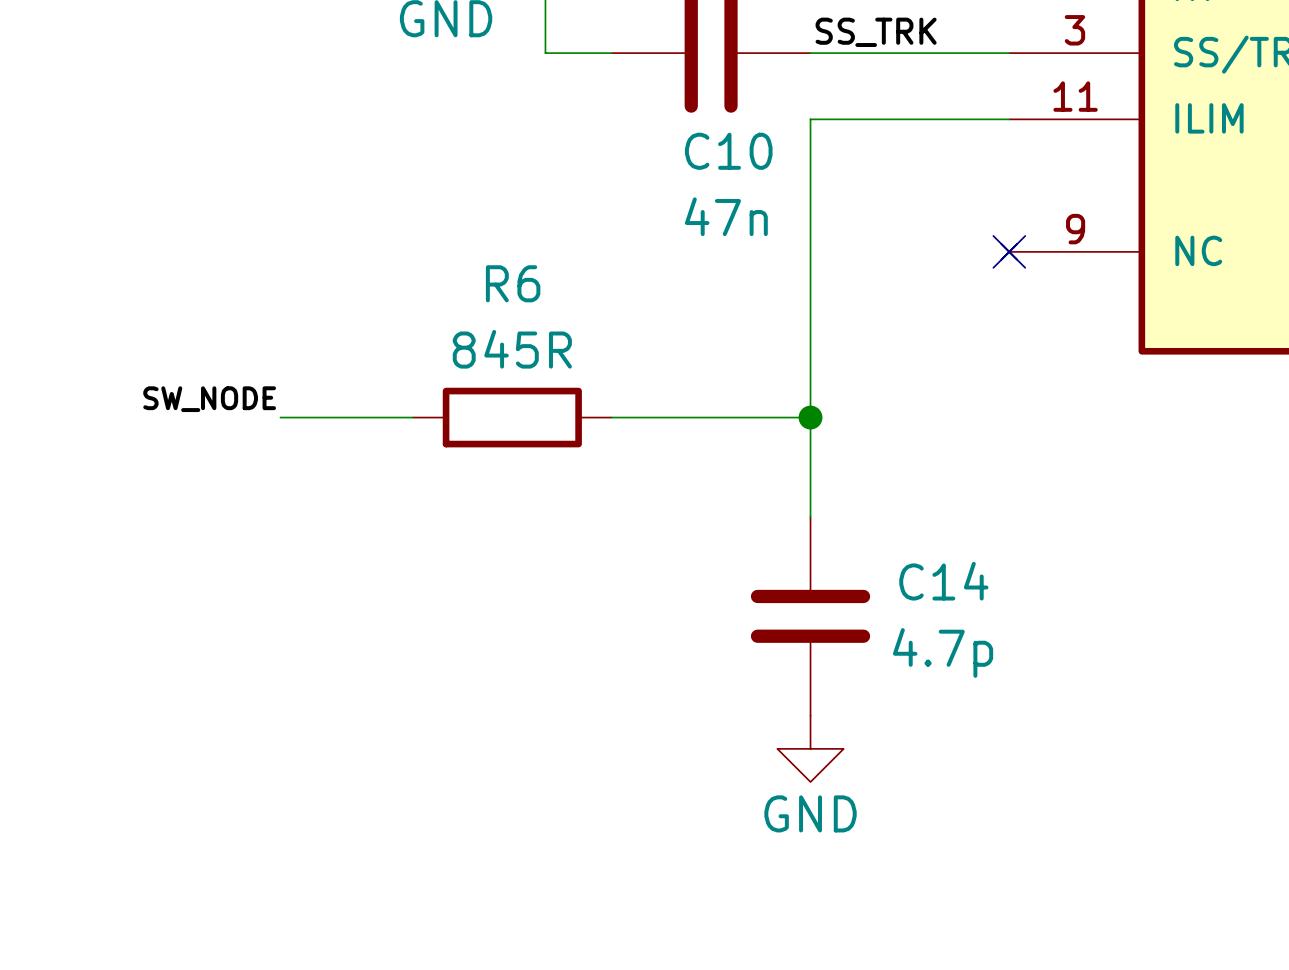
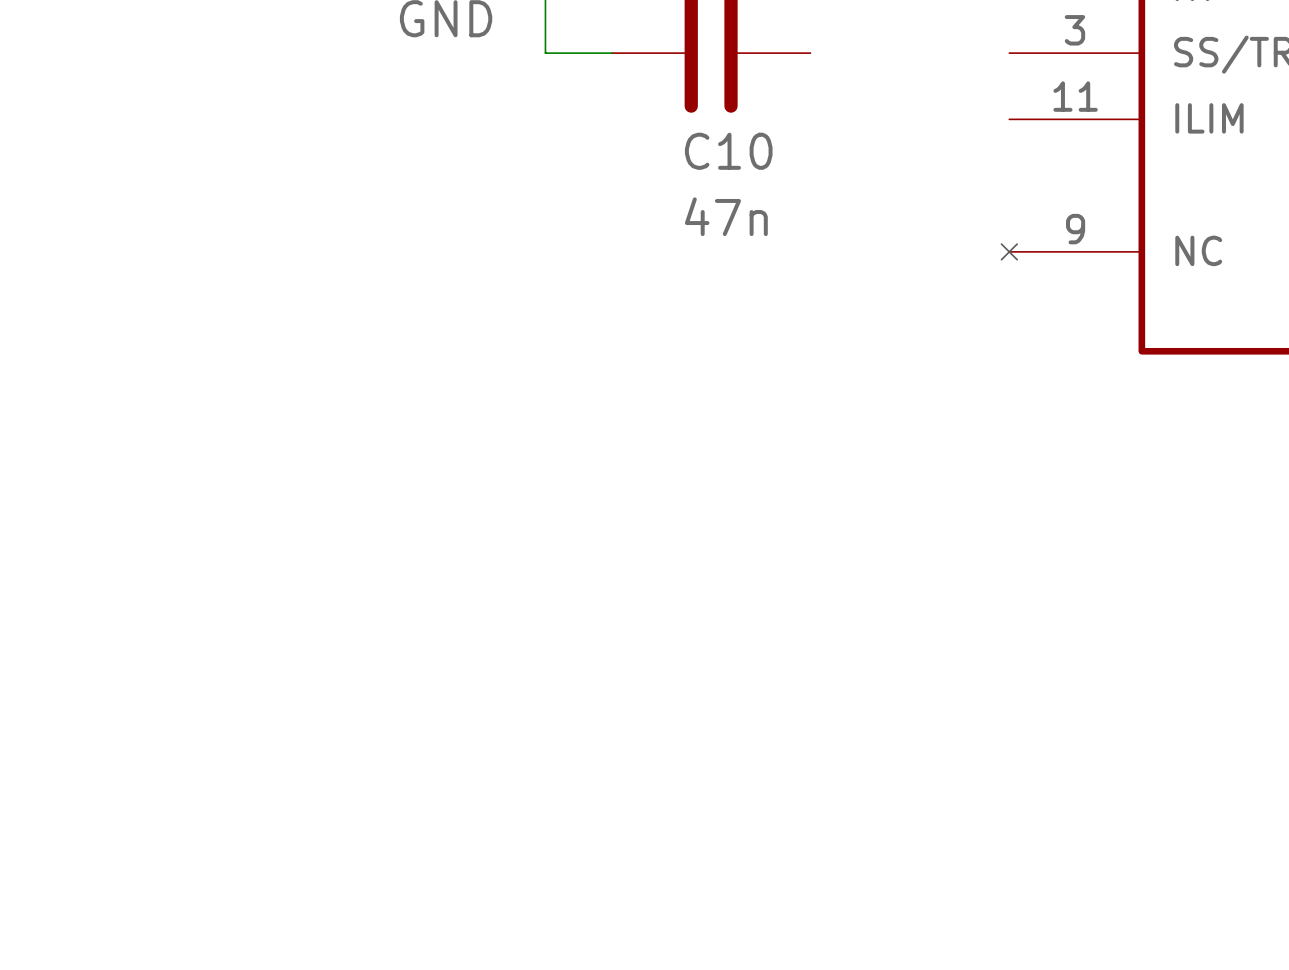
label: SS_TRK (876, 32) -> none
wire: (810, 53) (1009, 53) -> none
wire: (1009, 119) (810, 119) (810, 516) -> none
no-connect mark: (1009, 251) -> none
label: SW_NODE (209, 399) -> none
wire: (280, 417) (412, 417) -> none
R6: 845R (512, 417) -> none
wire: (611, 417) (810, 417) -> none
junction: (810, 417) -> none
C14: 4.7p (810, 616) -> none
power symbol: GND (810, 748) -> none

